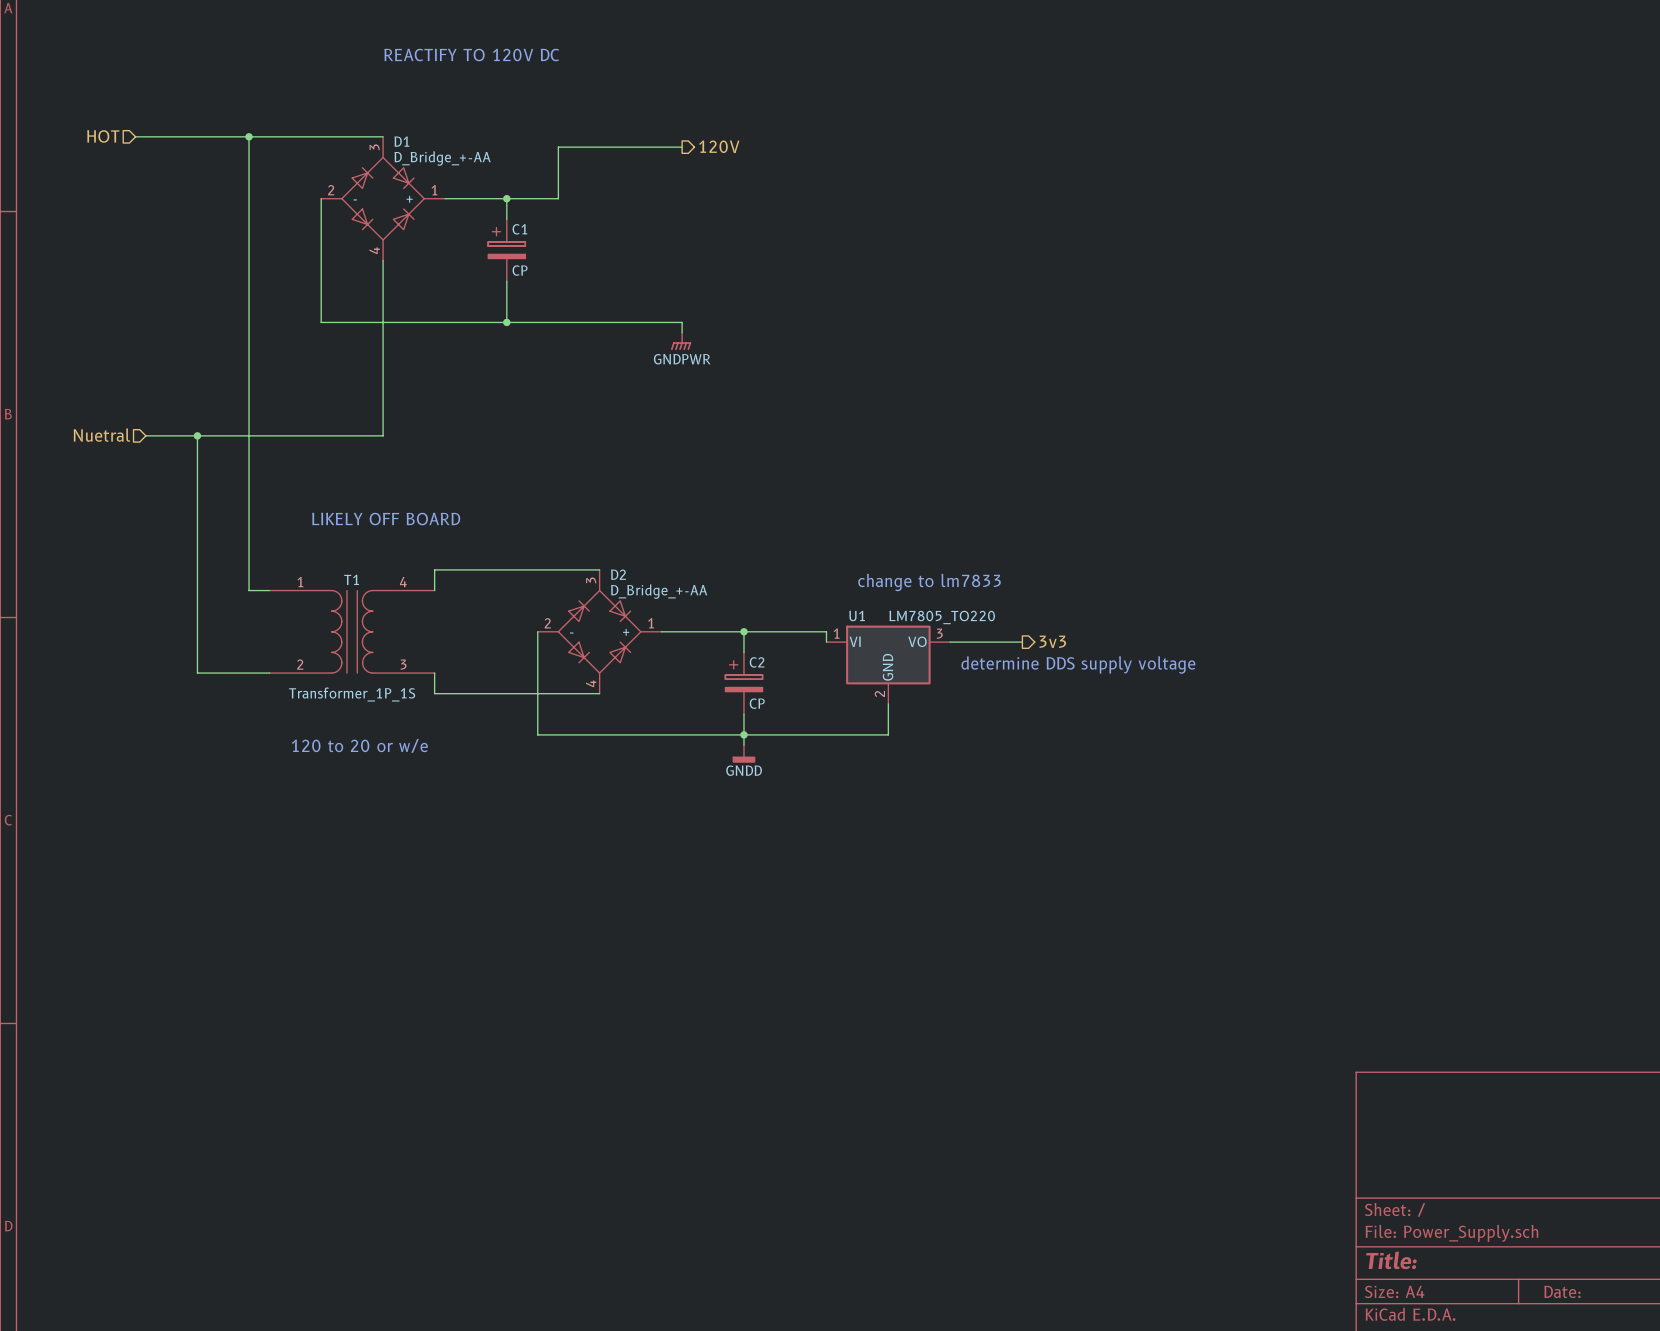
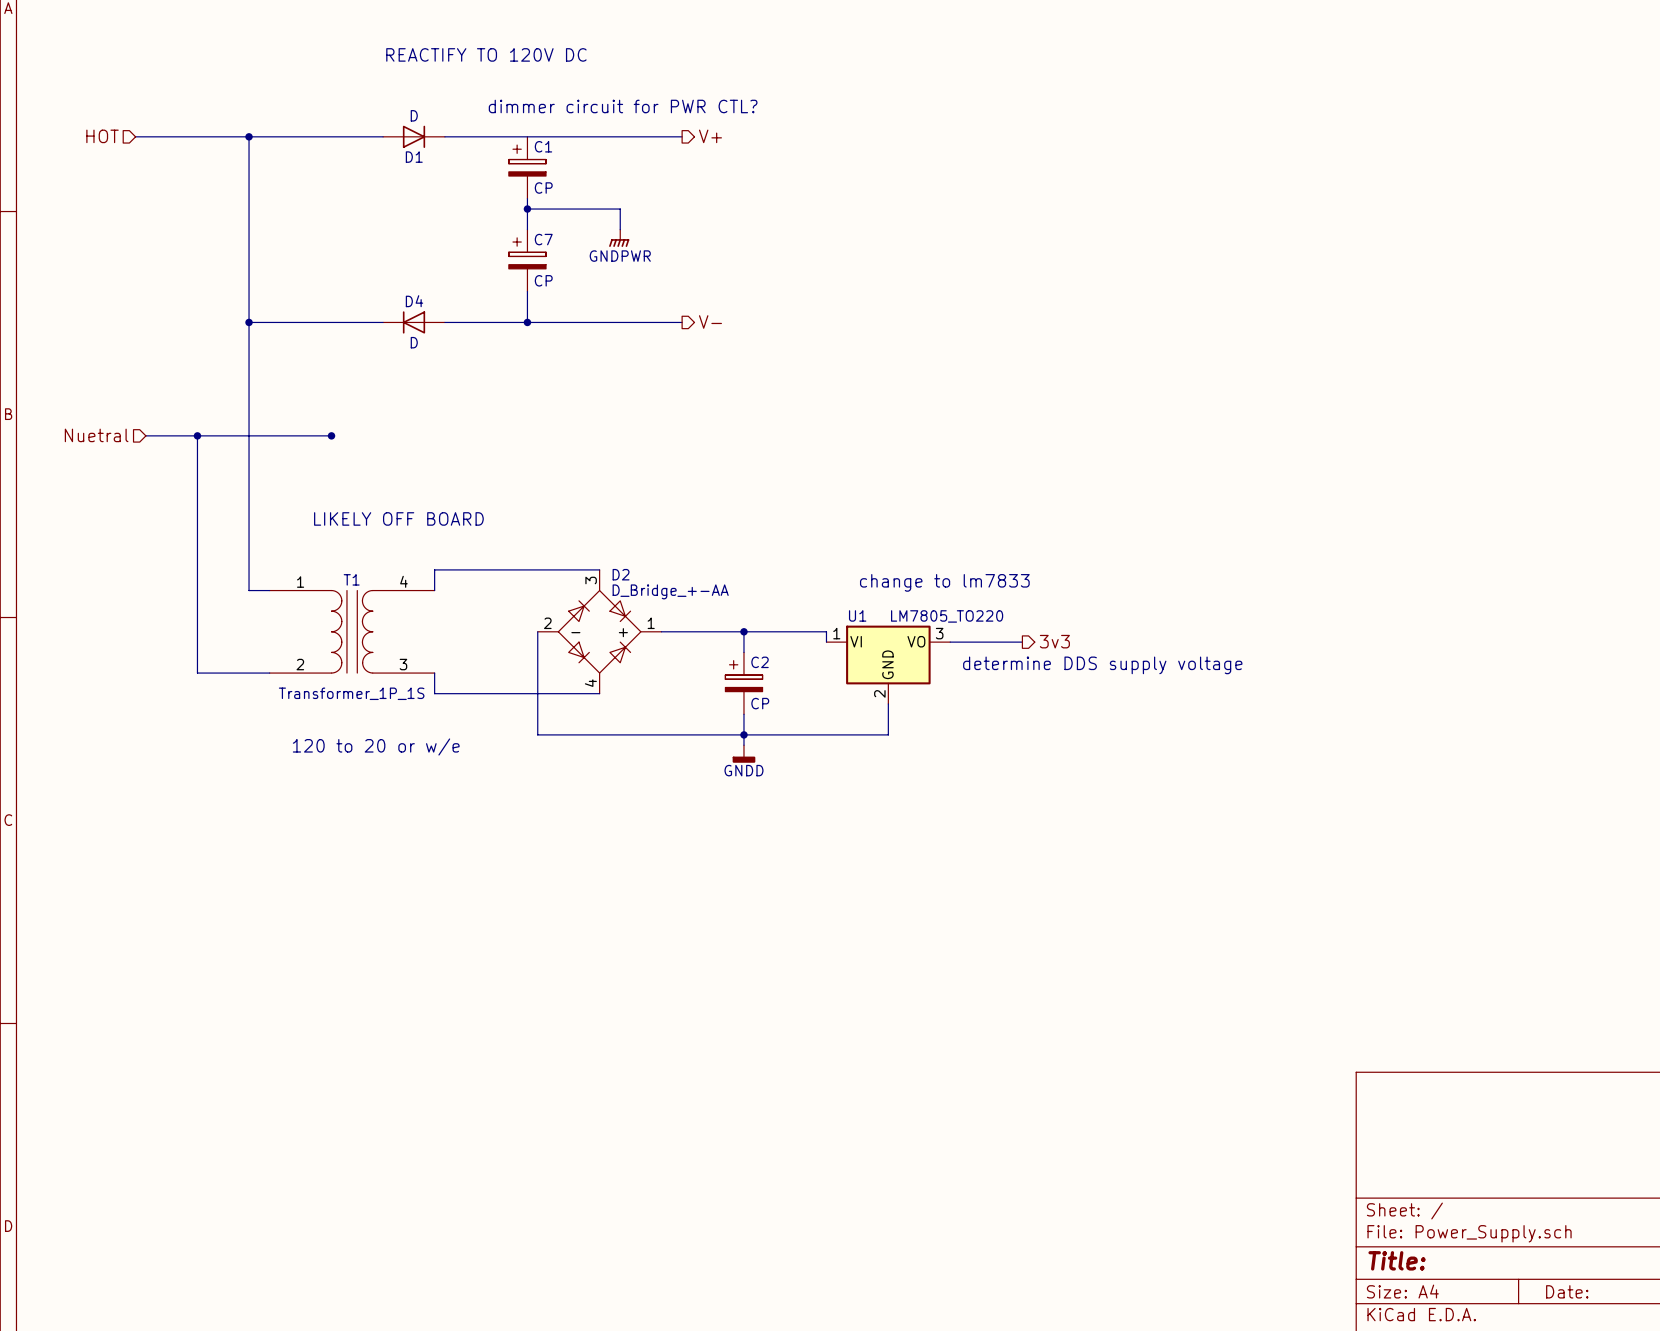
text: none -> dimmer circuit for PWR CTL? (623, 106)
D1 symbol: [321, 136, 445, 261] -> [383, 125, 445, 148]
wire: none -> (444, 136) (682, 136)
hierarchical label: none -> V+ (710, 136)
D1 name position: D1 (401, 141) -> D1 (414, 157)
hierarchical label: 120V (719, 146) -> none
wire: (682, 147) (558, 147) (558, 198) (444, 198) -> none
D1 value: D_Bridge_+-AA (442, 158) -> D (414, 115)
wire: (321, 198) (321, 322) -> (249, 322) (321, 322)
wire: (506, 198) (506, 219) -> none
junction position: (506, 198) -> (527, 209)
wire: none -> (527, 198) (527, 229)
wire: none -> (527, 209) (620, 209) (620, 229)
C1 position: (506, 250) -> (527, 167)
wire: (383, 260) (383, 435) (331, 435) -> none
C7: none -> CP (527, 260)
wire: (506, 281) (506, 322) -> none
wire: none -> (527, 291) (527, 322)
junction: none -> (249, 322)
D4: none -> D (414, 322)
junction position: (506, 322) -> (527, 322)
hierarchical label: none -> V- (710, 321)
power symbol position: GNDPWR (681, 341) -> GNDPWR (619, 238)
junction: none -> (331, 435)

